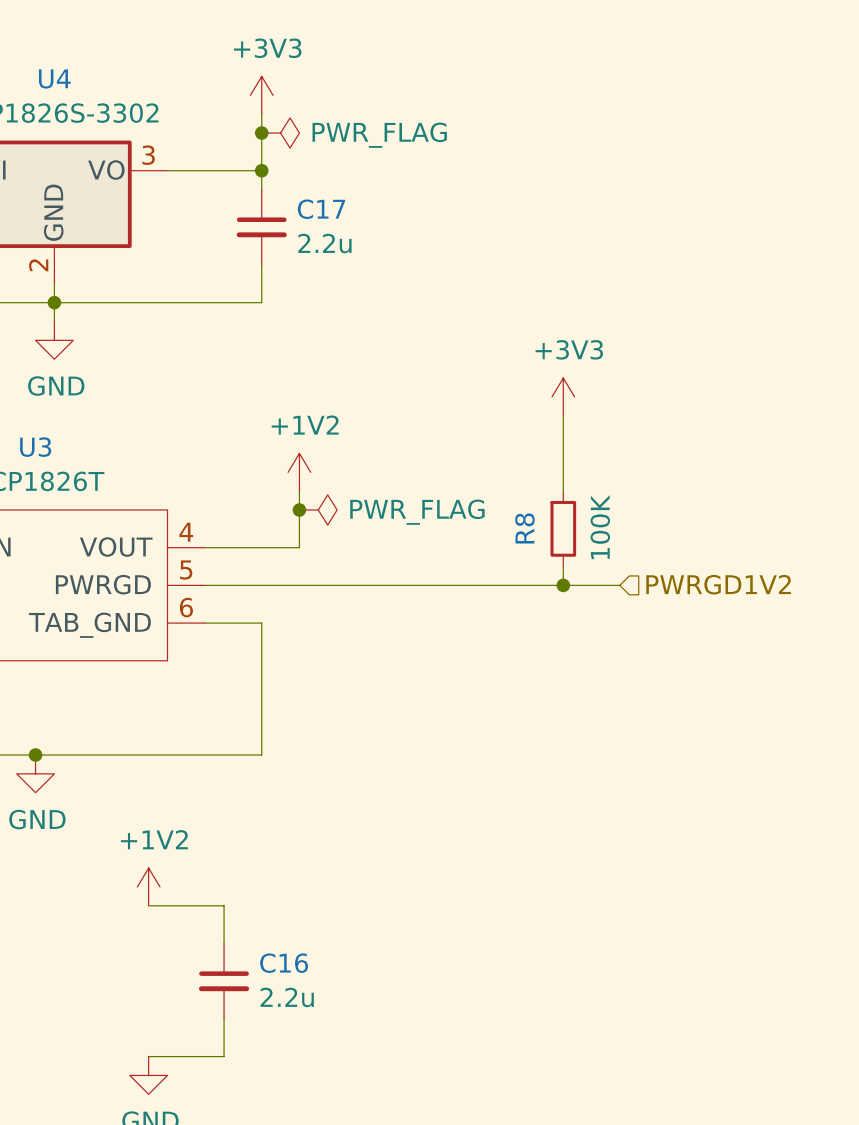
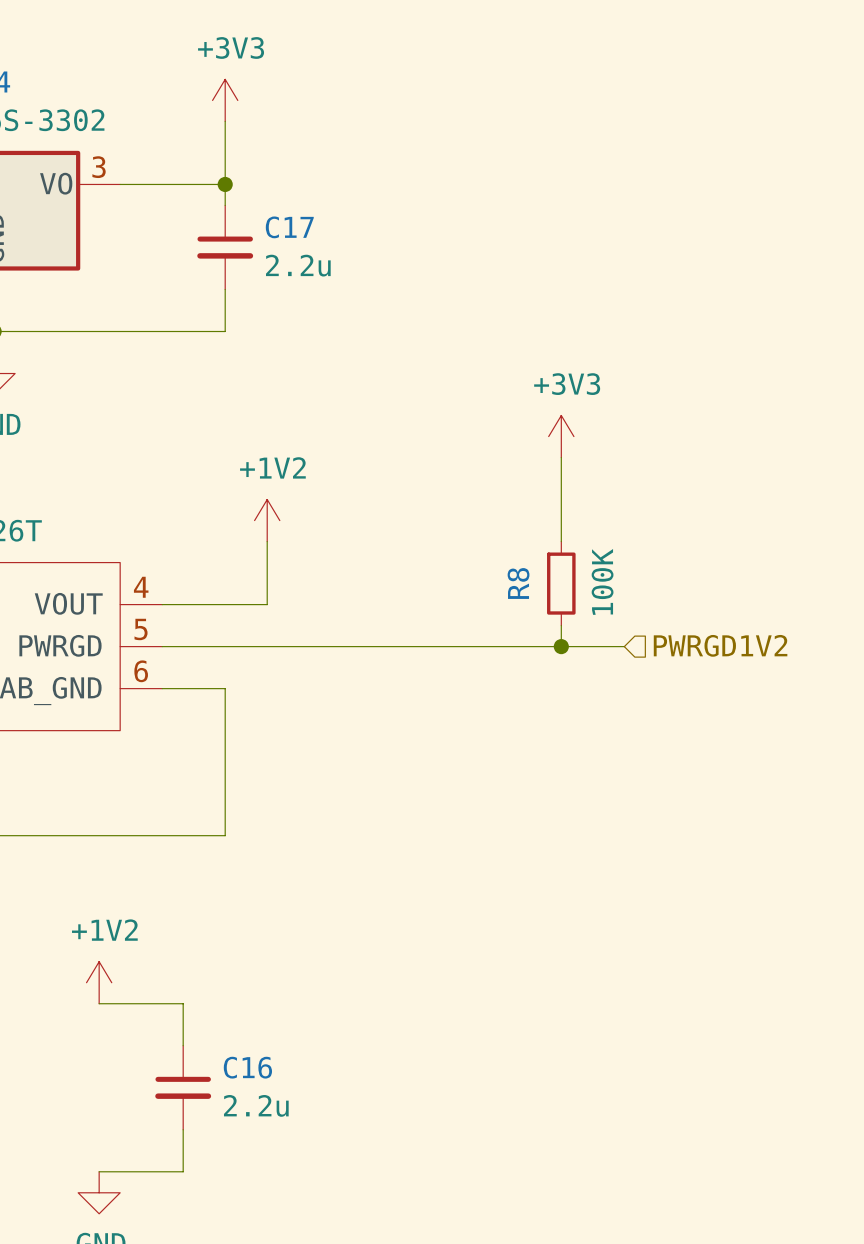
junction: (261, 133) -> none
power symbol: PWR_FLAG (280, 133) -> none
junction: (299, 509) -> none
power symbol: PWR_FLAG (318, 509) -> none

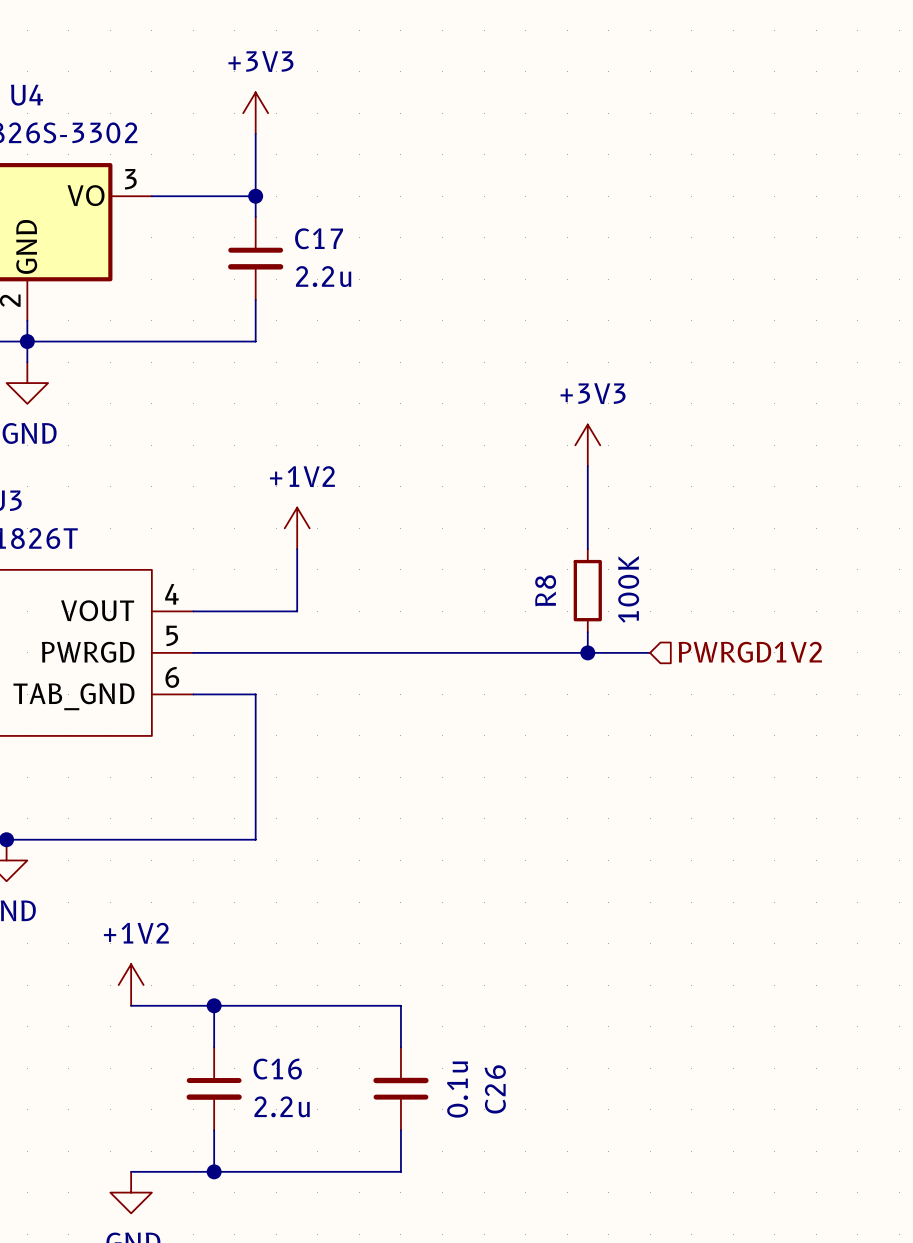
wire: none -> (214, 1005) (400, 1005) (400, 1047)
junction: none -> (214, 1005)
C26: none -> 0.1u (400, 1088)
wire: none -> (400, 1130) (400, 1171) (214, 1171)
junction: none -> (214, 1171)

